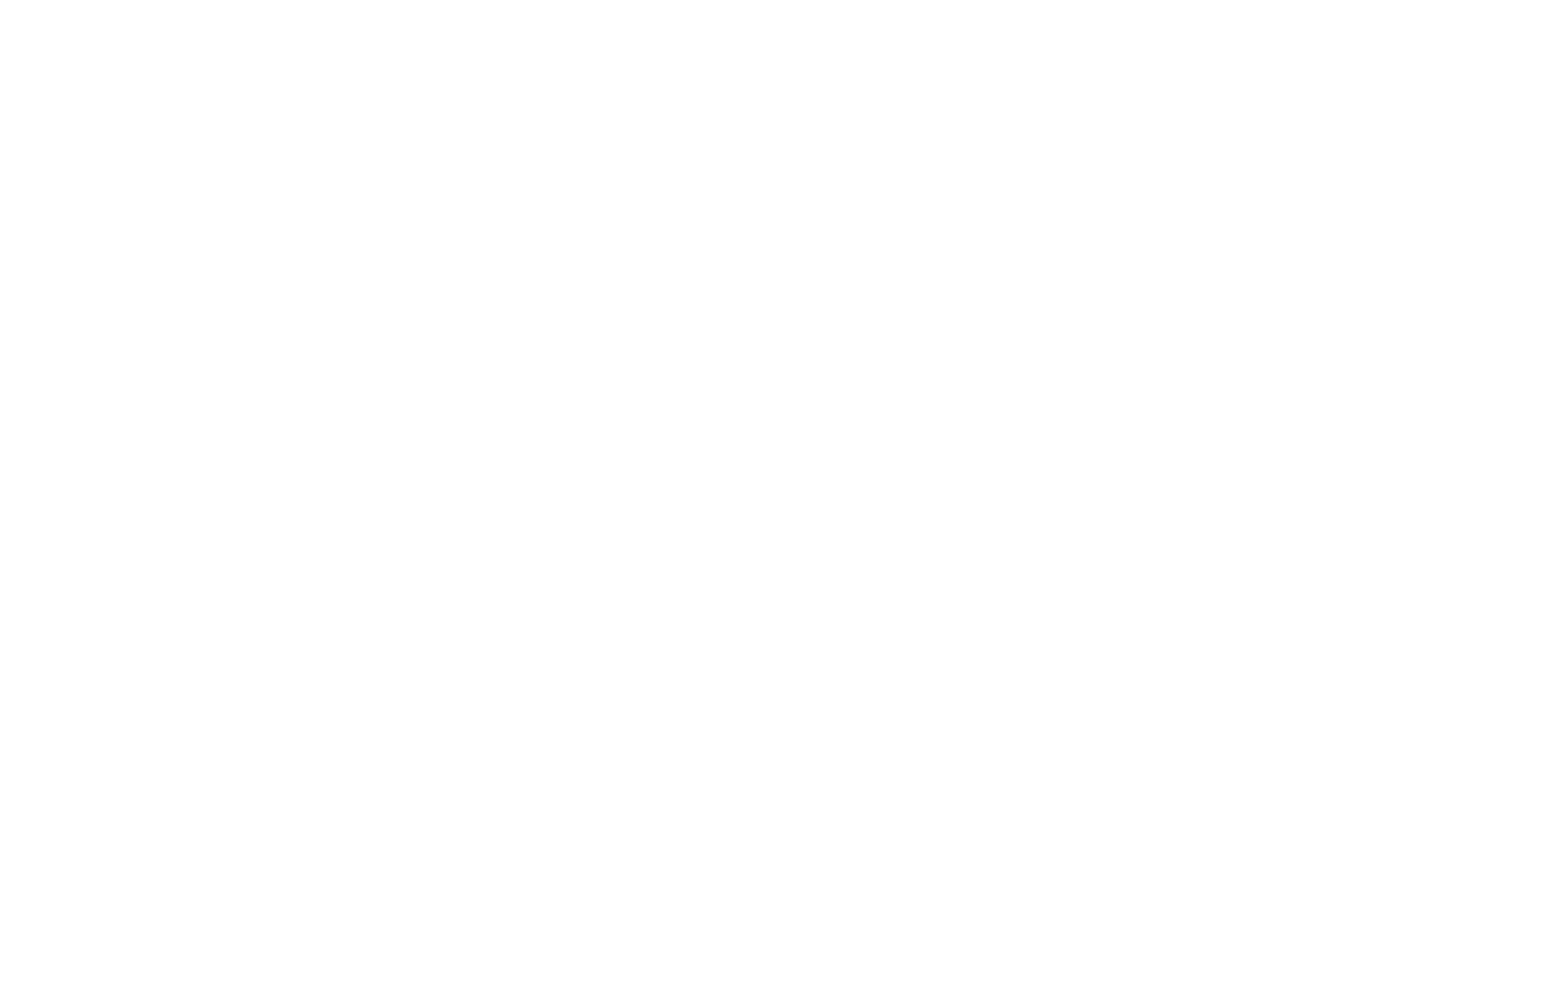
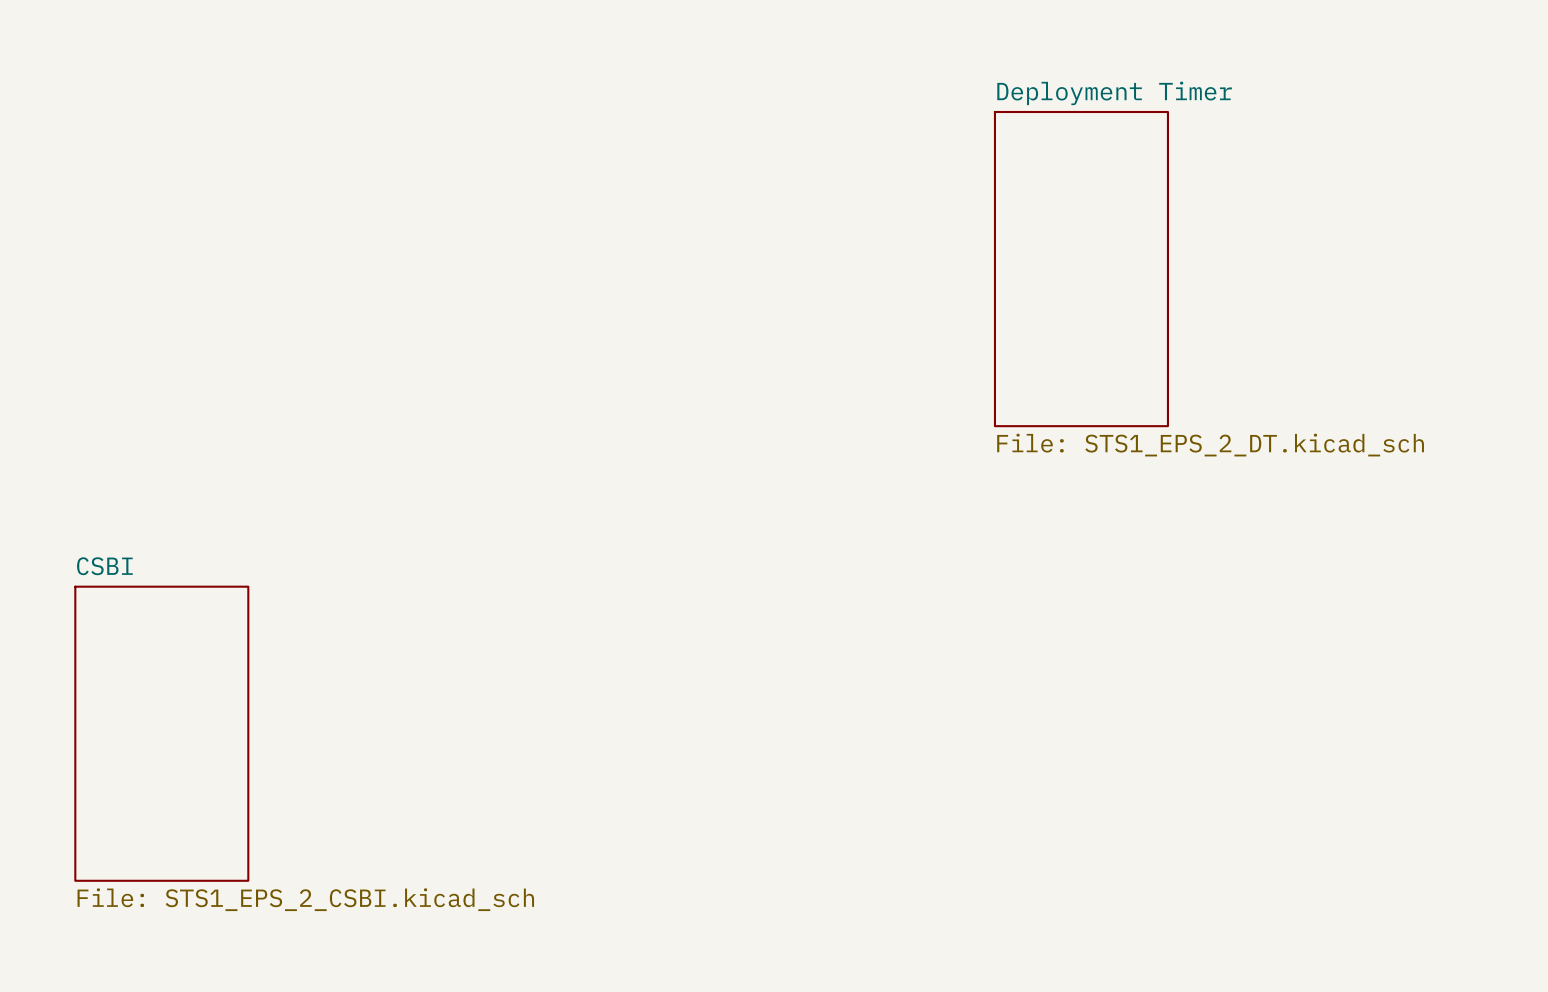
sheet Deployment Timer: none -> File: STS1_EPS_2_DT.kicad_sch (1081, 269)
sheet CSBI: none -> File: STS1_EPS_2_CSBI.kicad_sch (161, 733)

